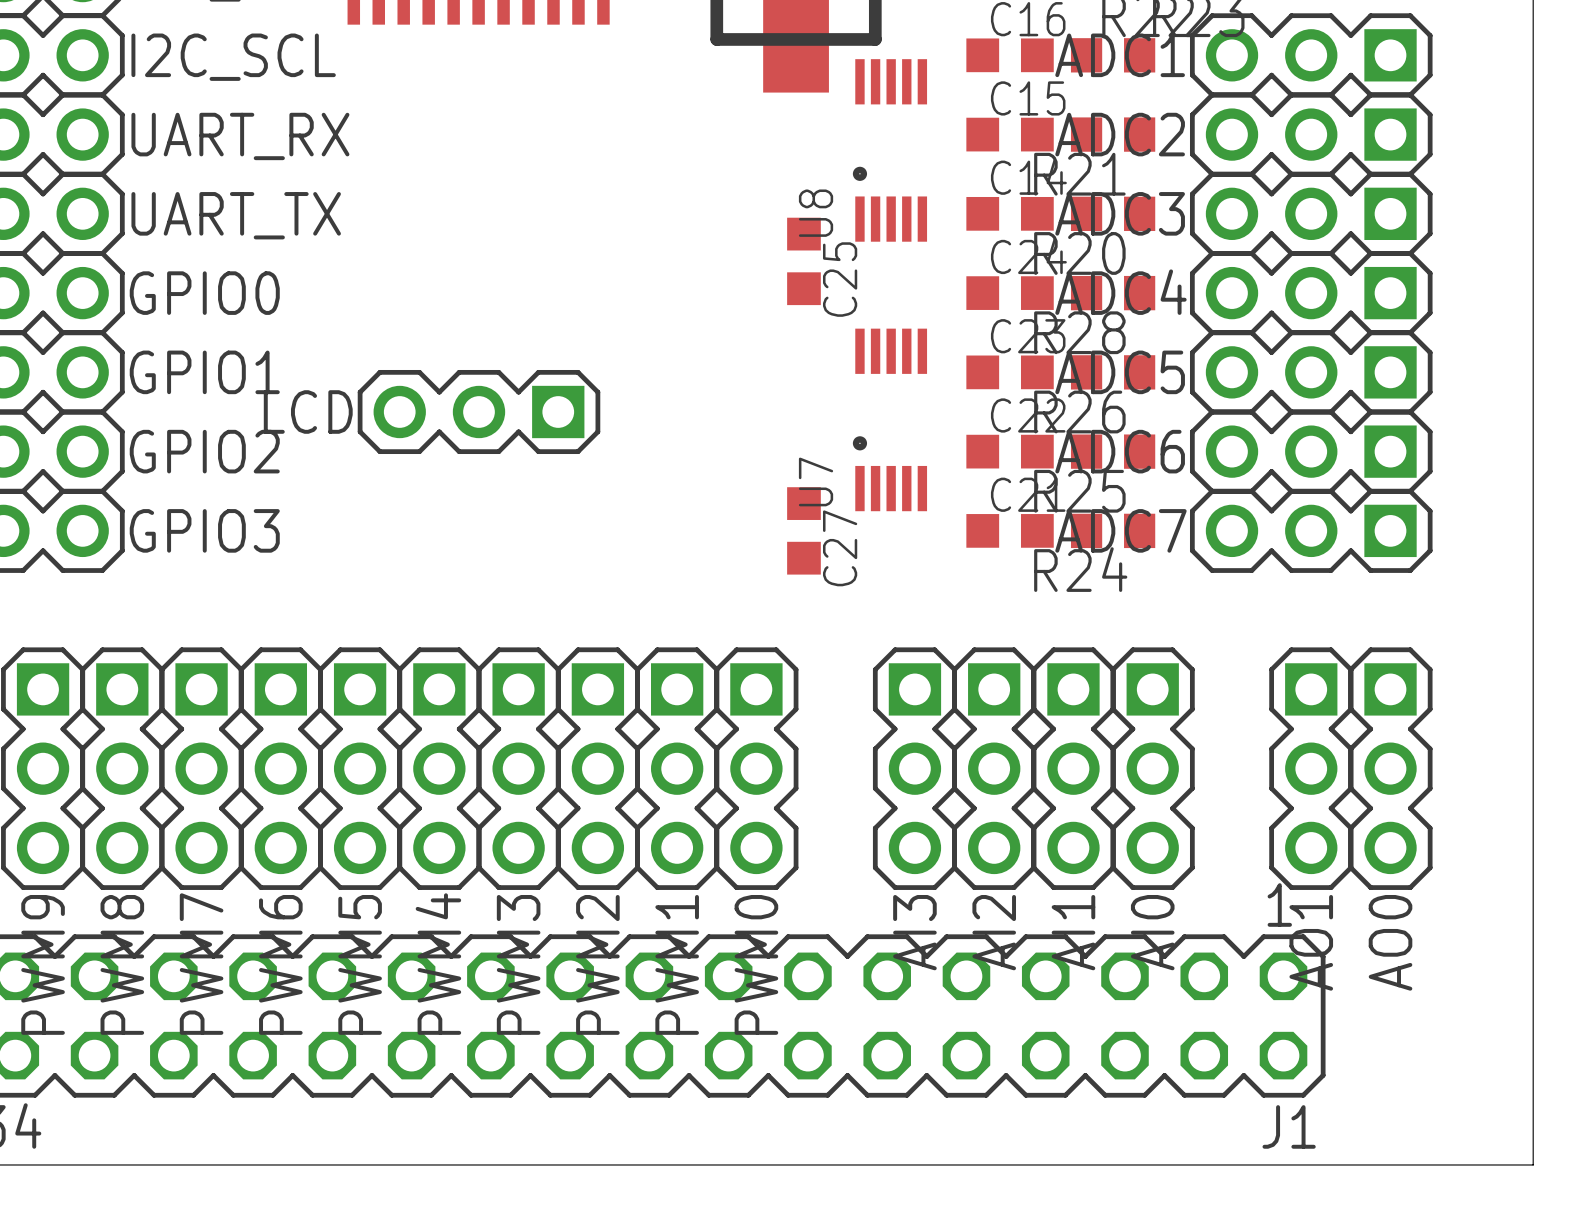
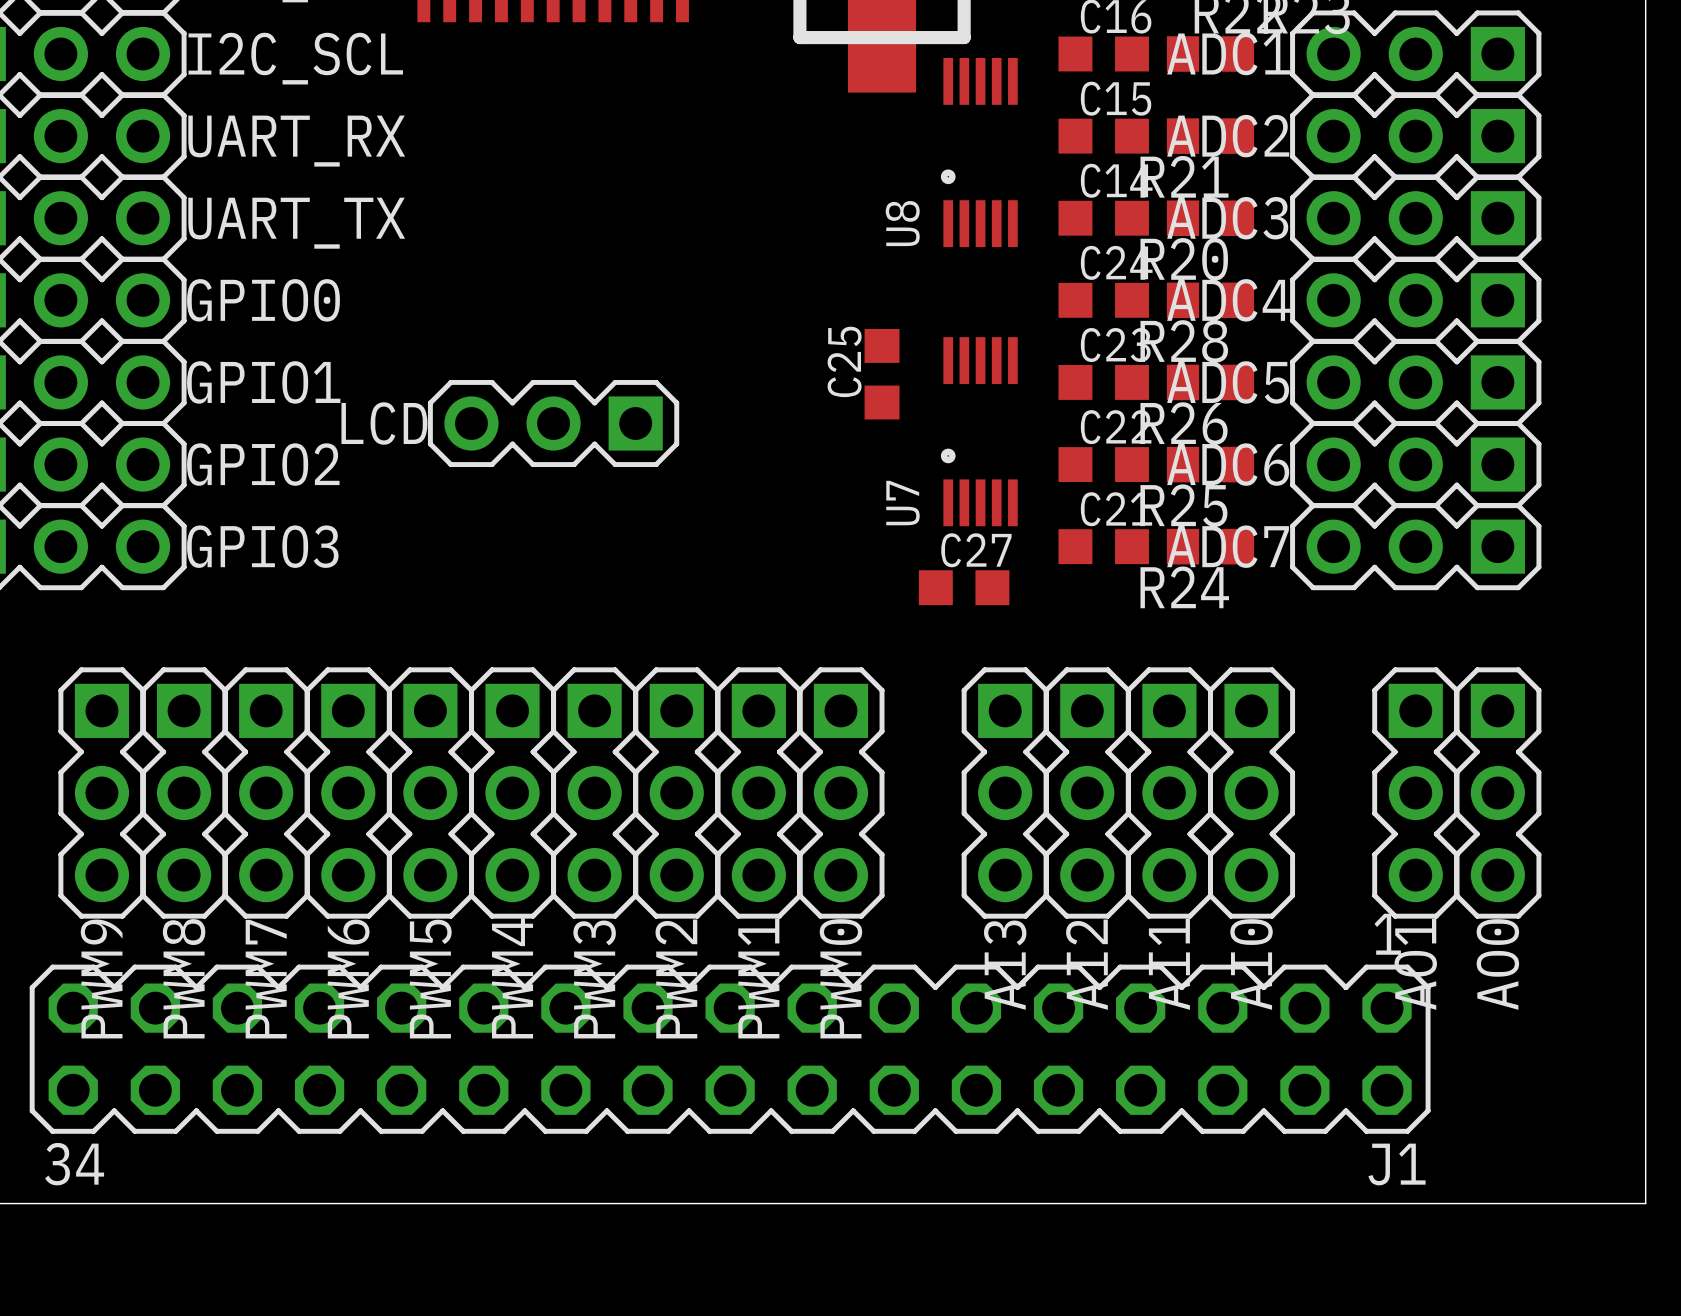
C25 position: (803, 261) -> (882, 374)
C25 name position: C25 (840, 279) -> C25 (844, 361)
C27 rotation: 0° (803, 530) -> 90° clockwise (964, 587)
C27 position: (803, 530) -> (964, 587)

